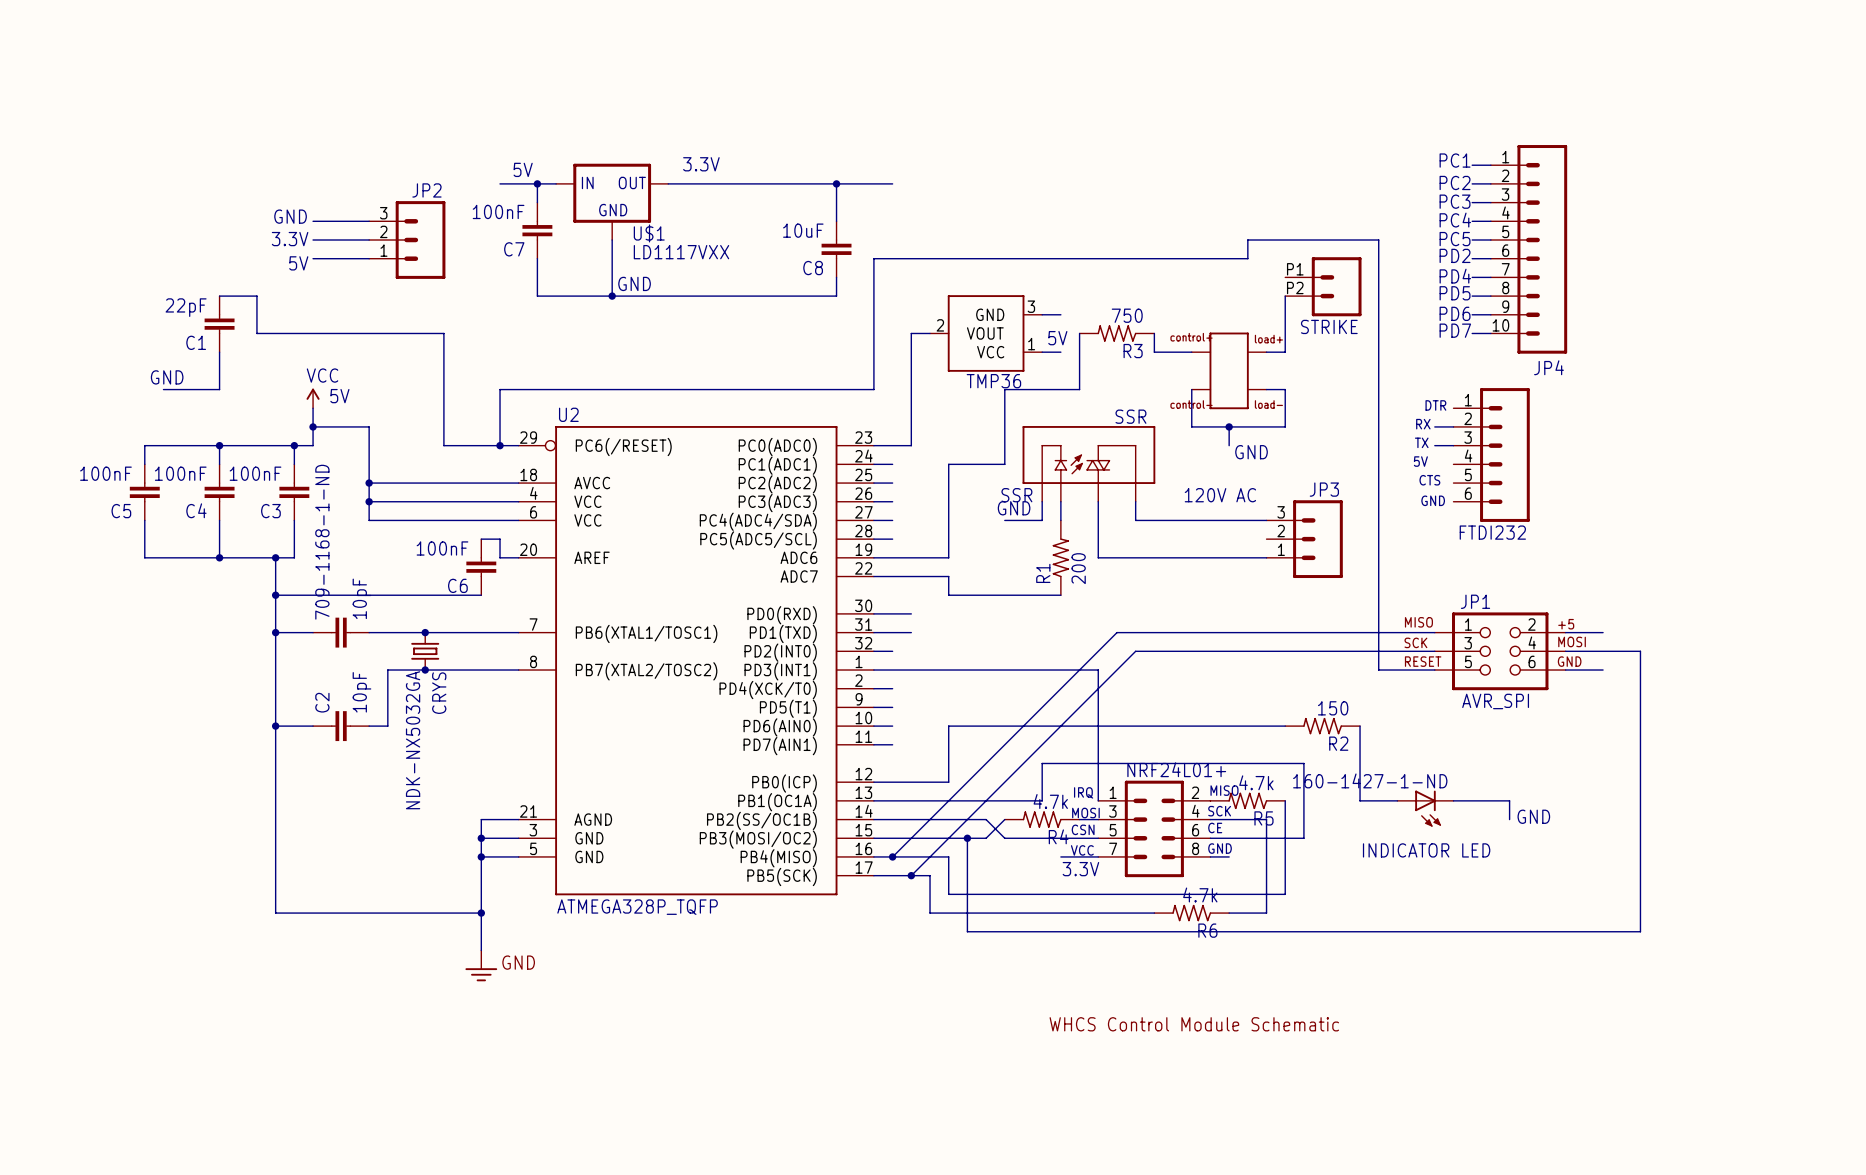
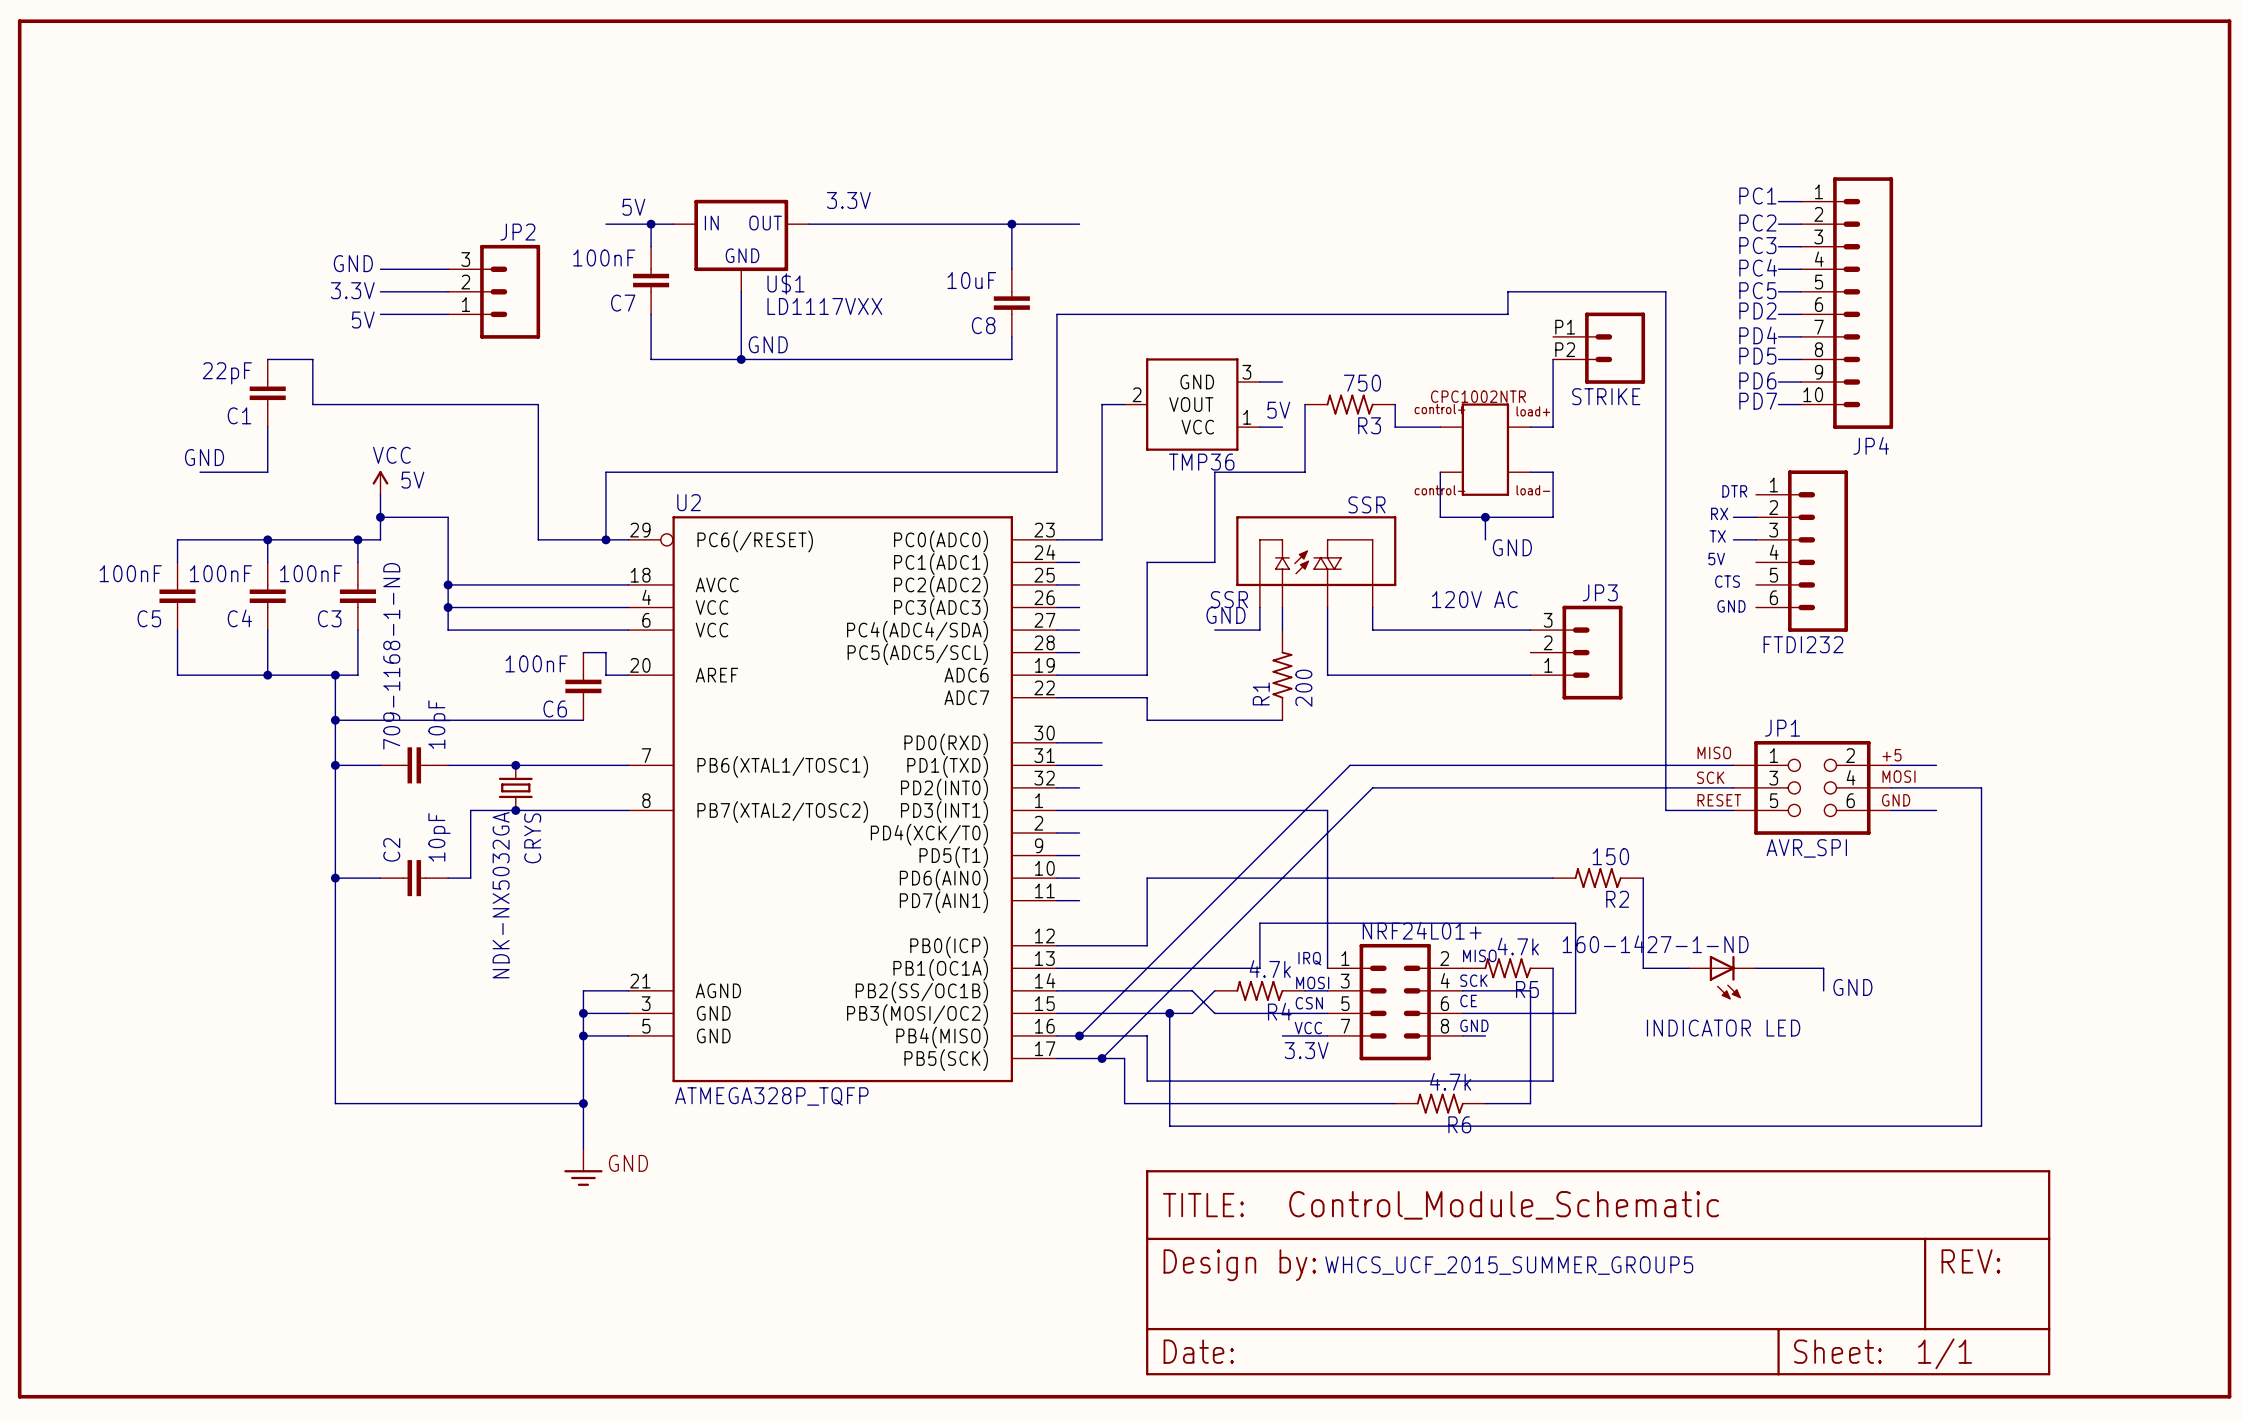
part value: none -> CPC1002NTR (1478, 396)
part: none -> (1124, 708)
text: WHCS Control Module Schematic (1194, 1024) -> none
text: none -> WHCS_UCF_2015_SUMMER_GROUP5 (1509, 1265)
part: none -> (1598, 1272)

